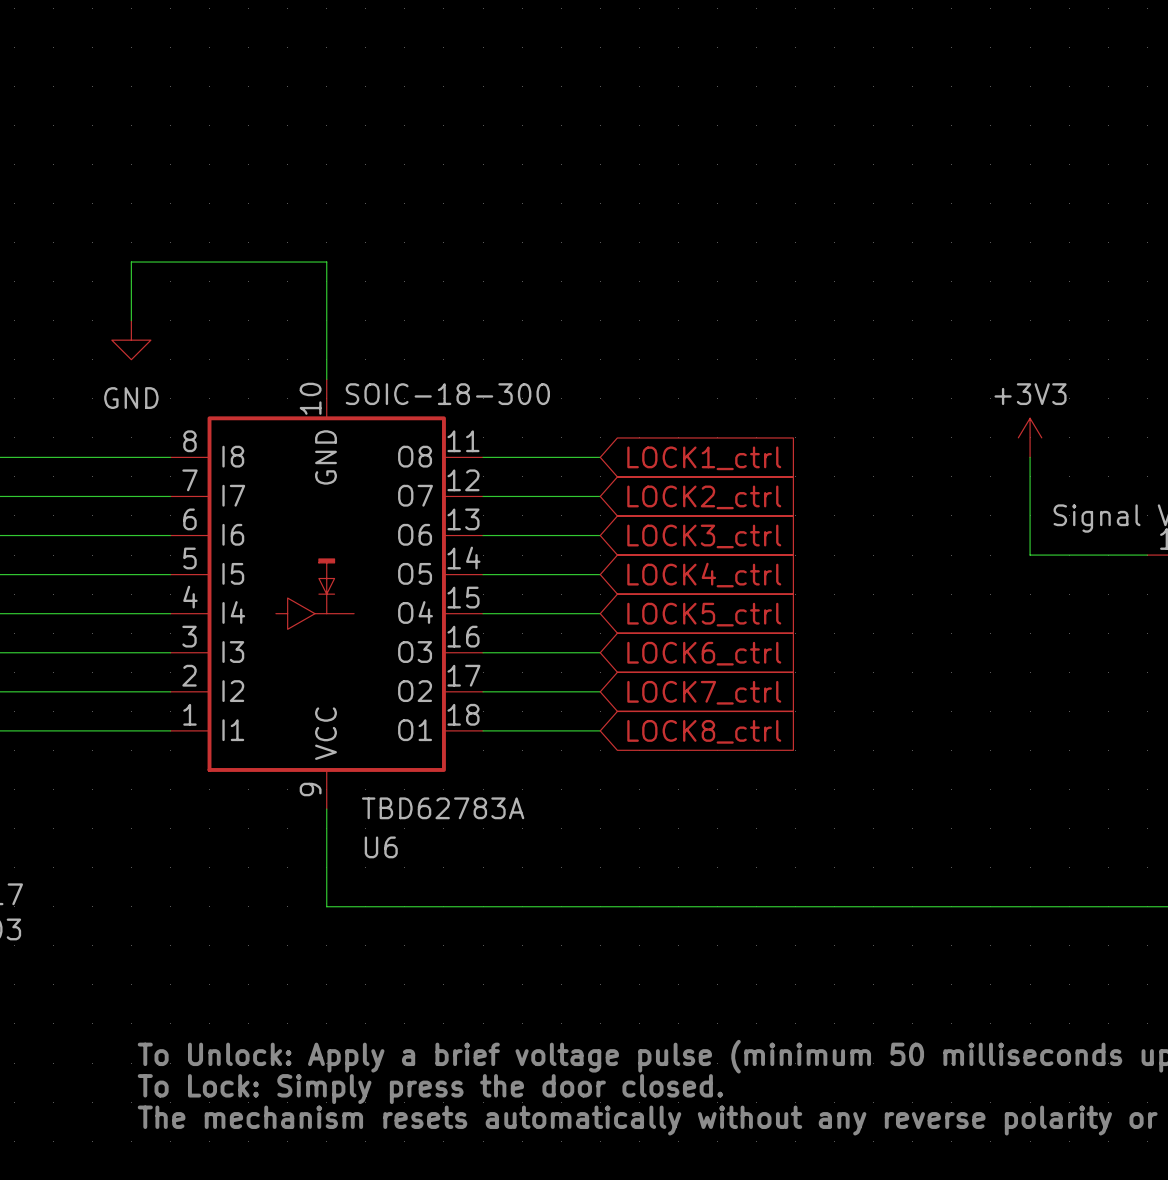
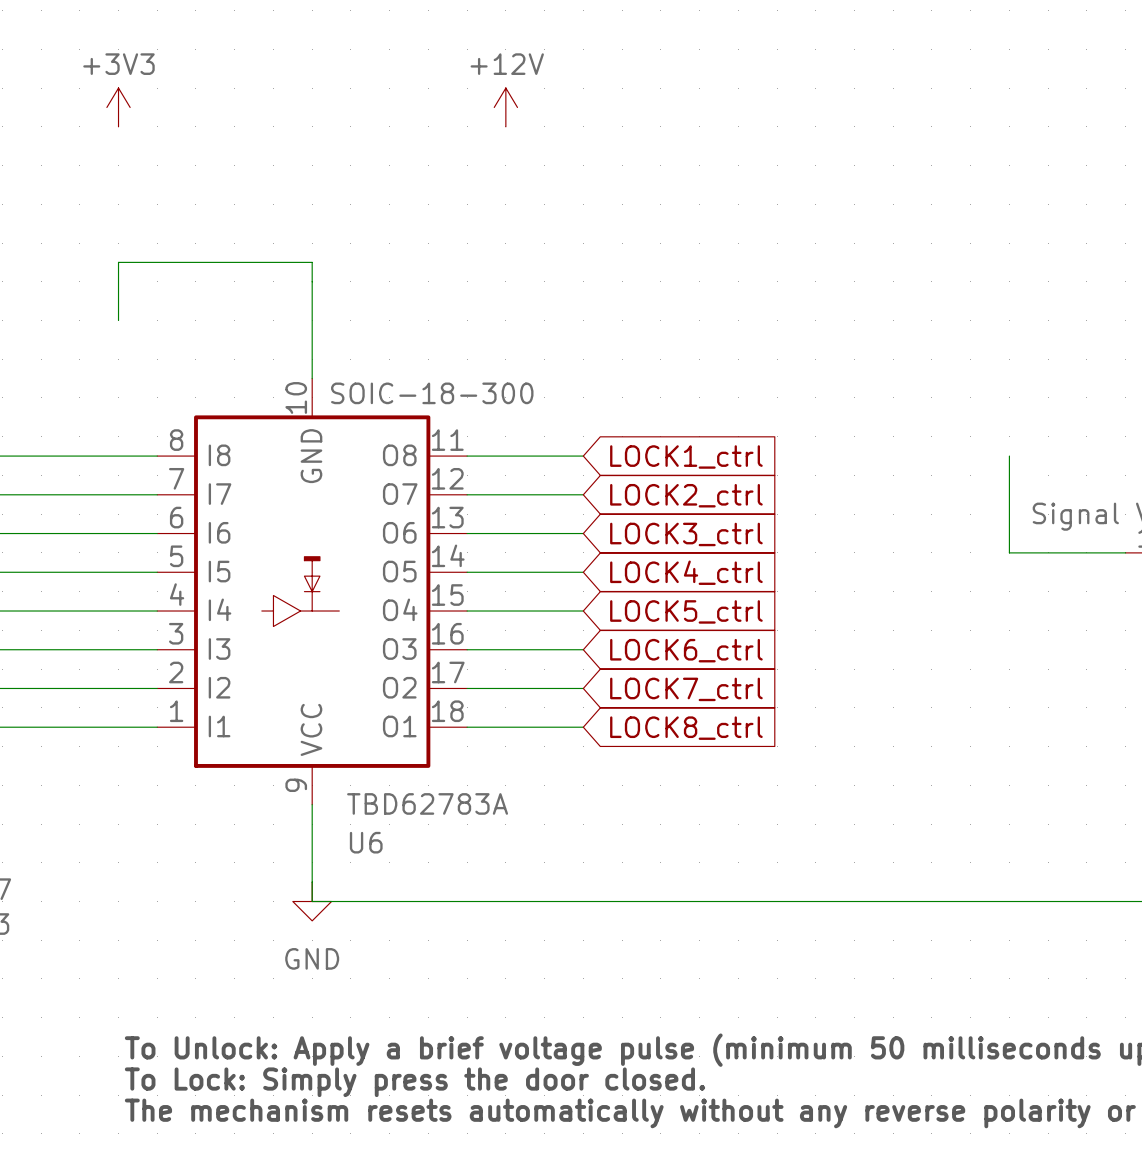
power symbol: none -> +3V3 (118, 107)
power symbol: none -> +12V (505, 107)
power symbol: GND (131, 340) -> none
power symbol: +3V3 (1030, 437) -> none
power symbol: none -> GND (312, 901)

